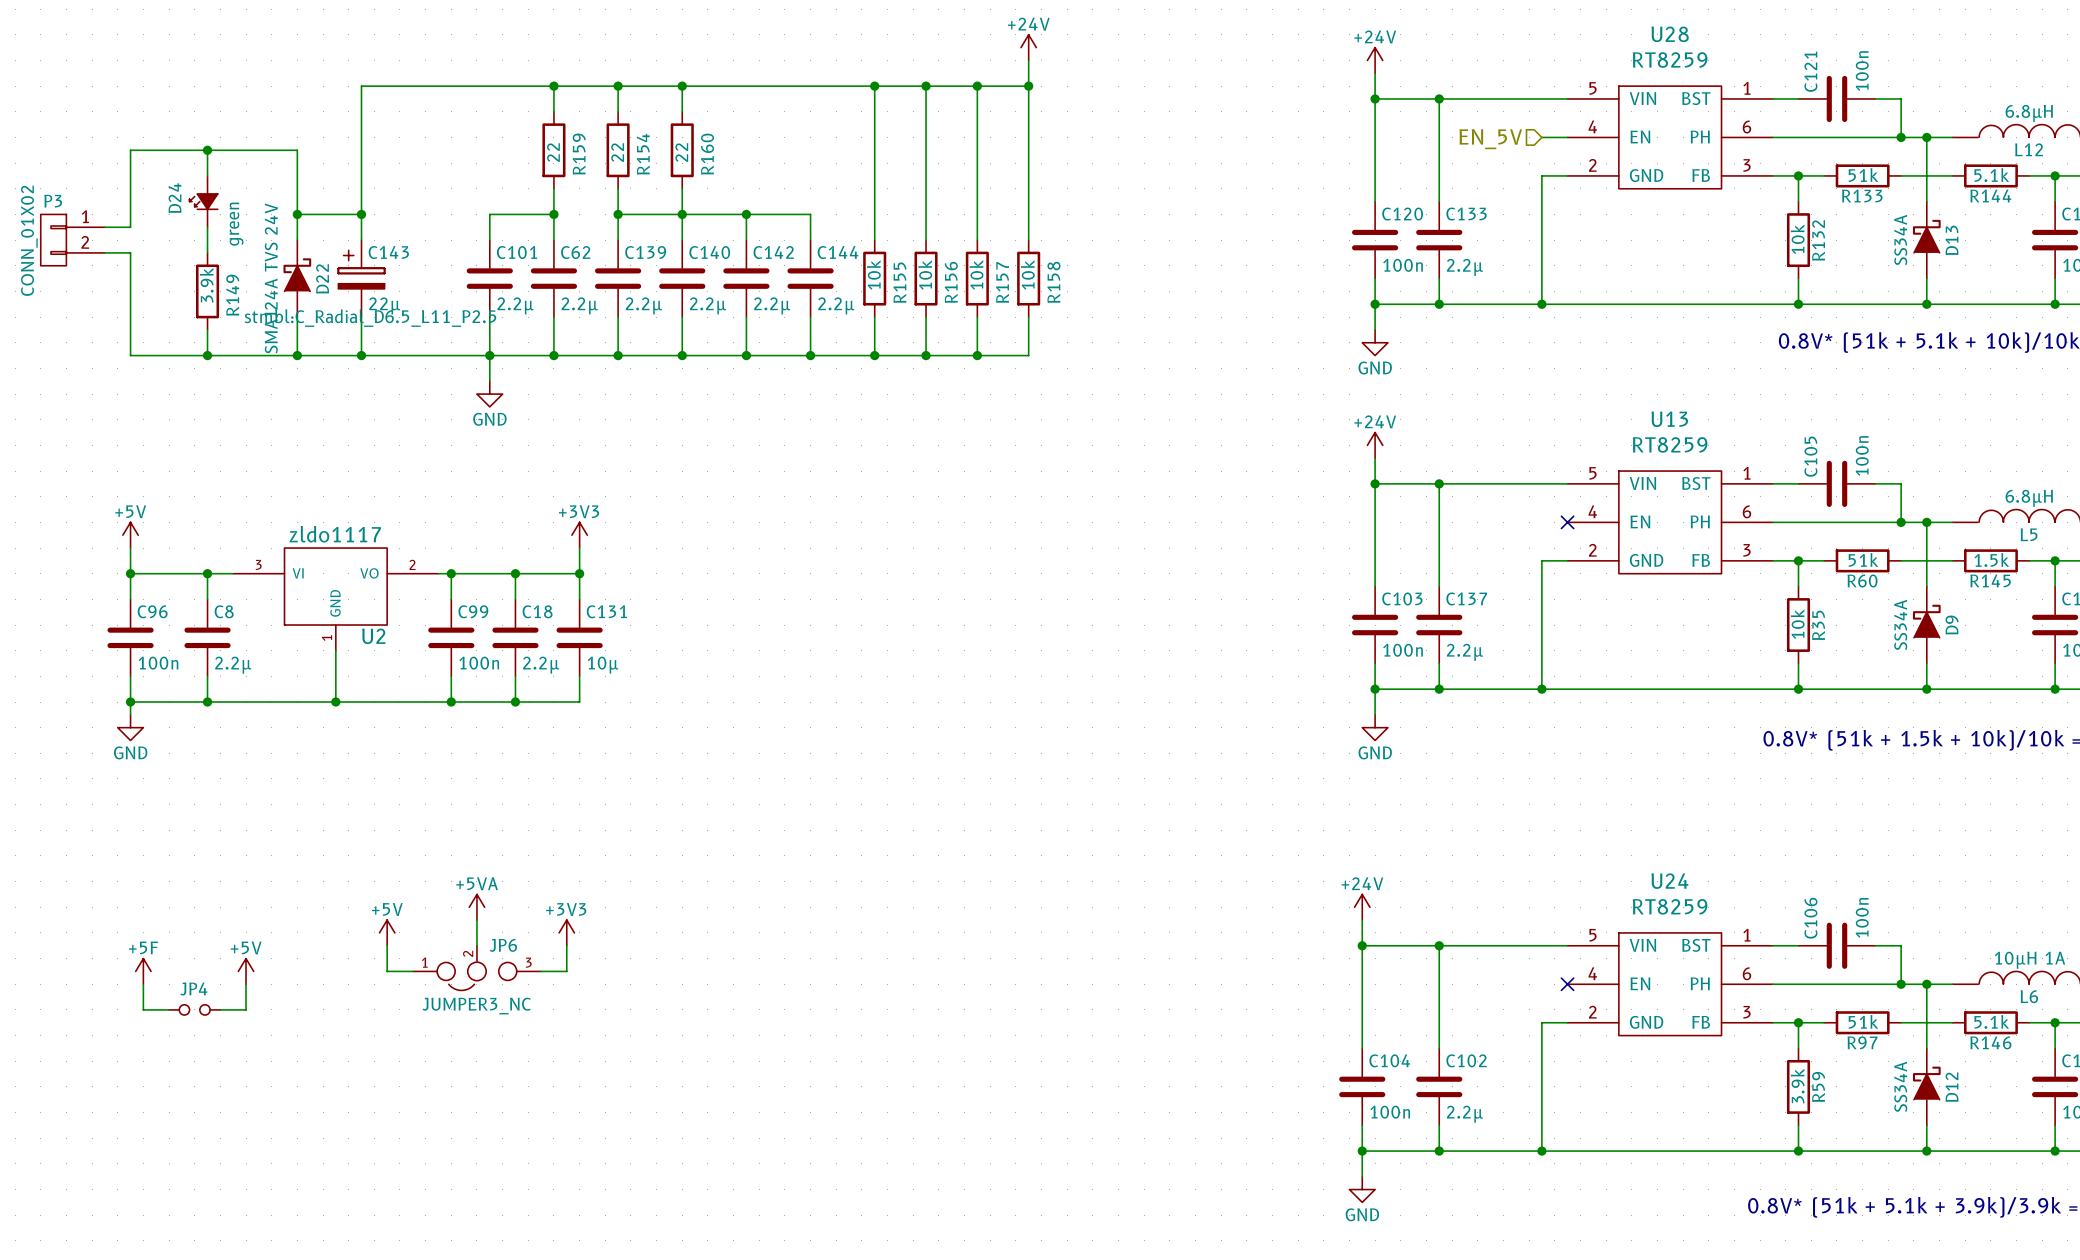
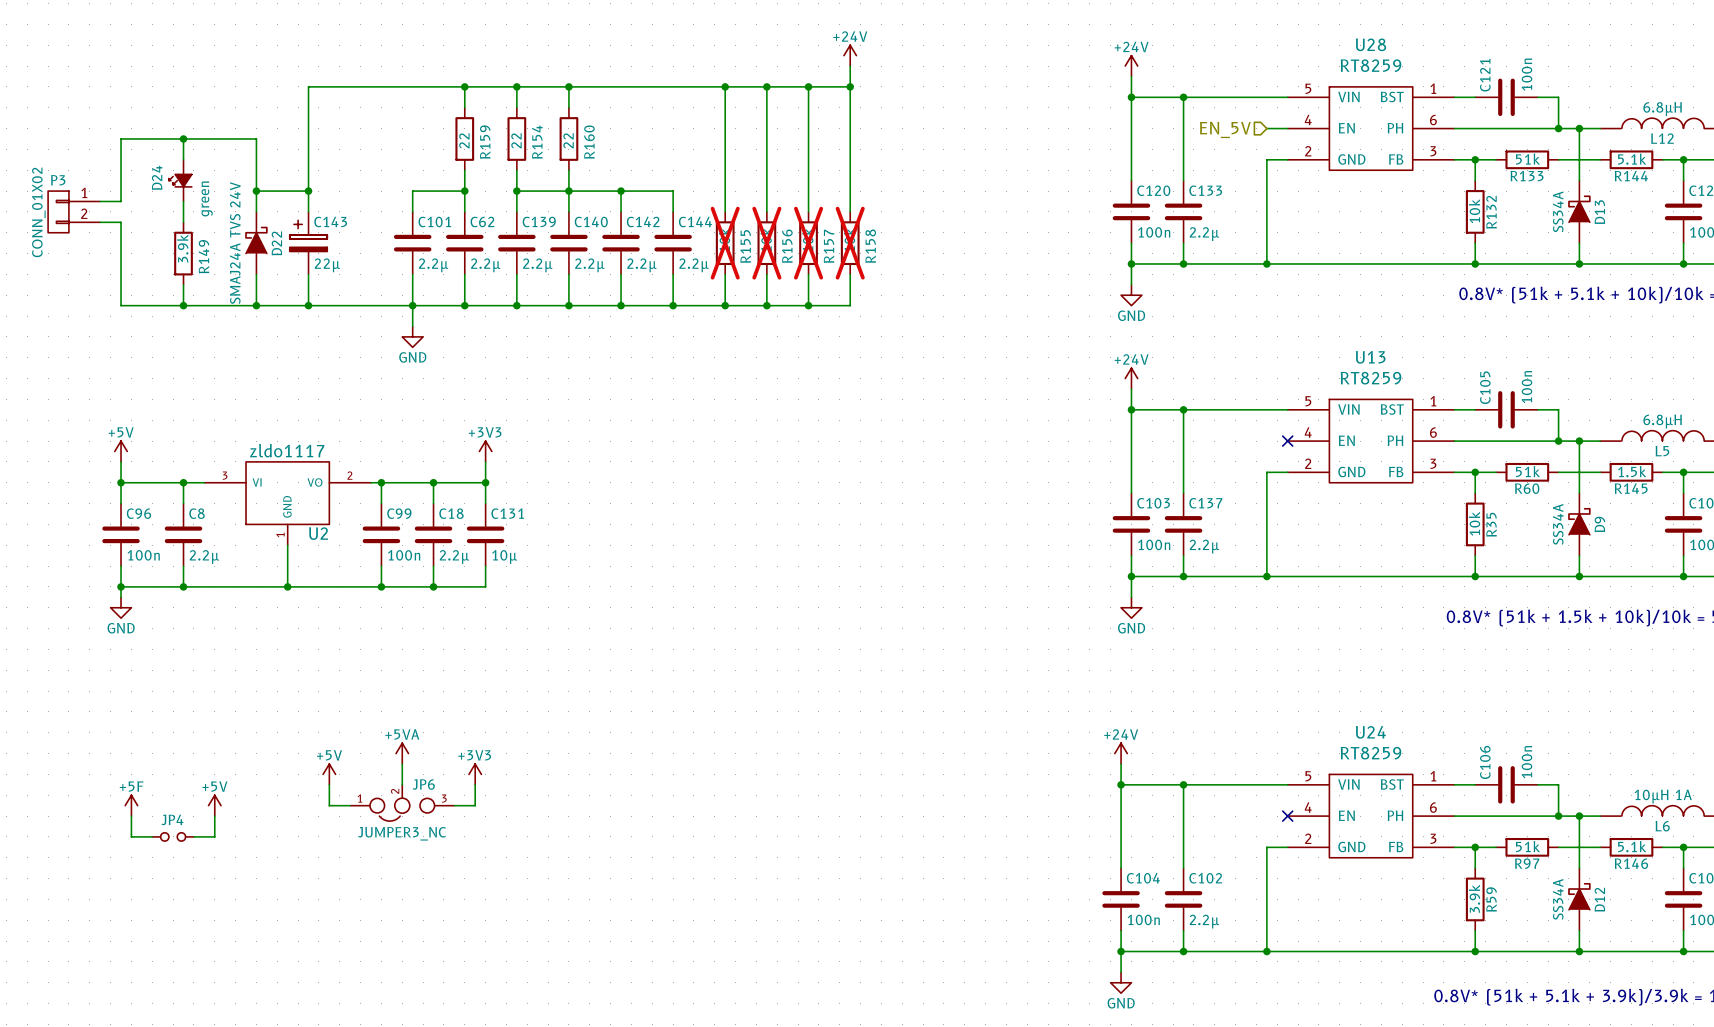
R155 do-not-place cross: none -> (725, 243)
R156 do-not-place cross: none -> (766, 243)
R157 do-not-place cross: none -> (808, 243)
R158 do-not-place cross: none -> (850, 243)
C143 text: stmbl:C_Radial_D6.5_L11_P2.5 (370, 318) -> none

